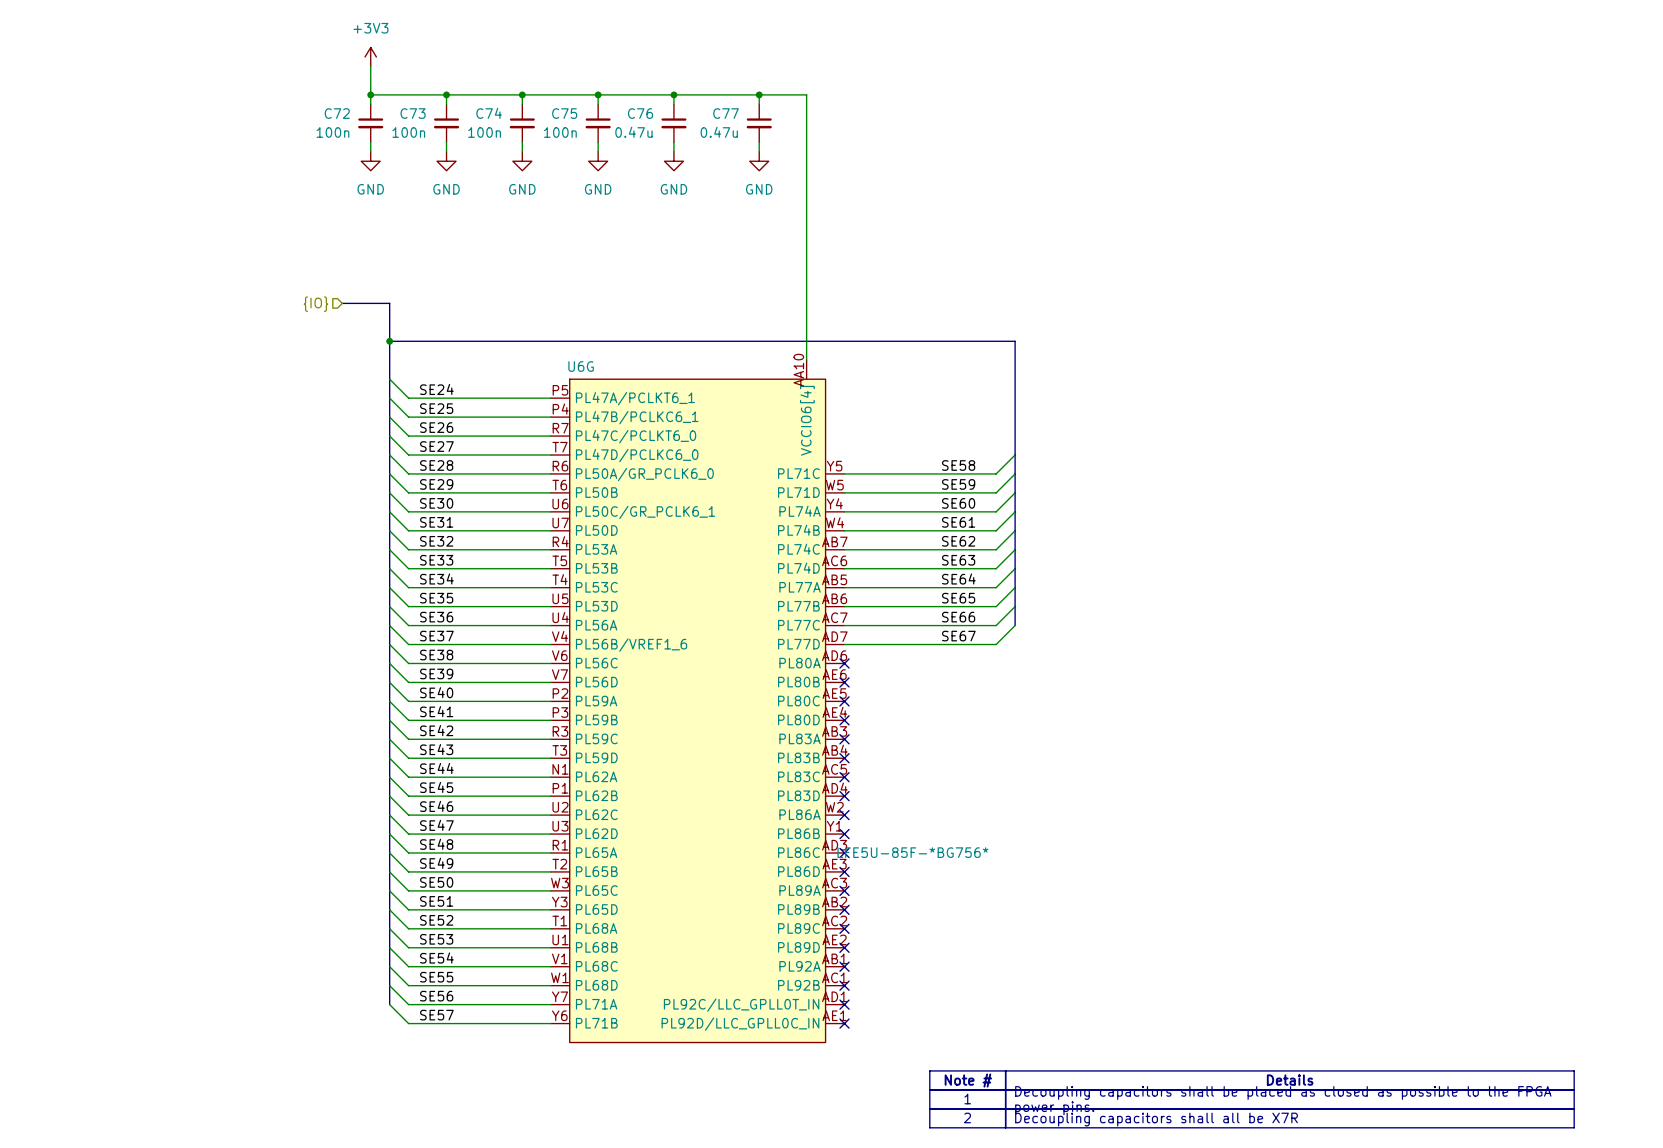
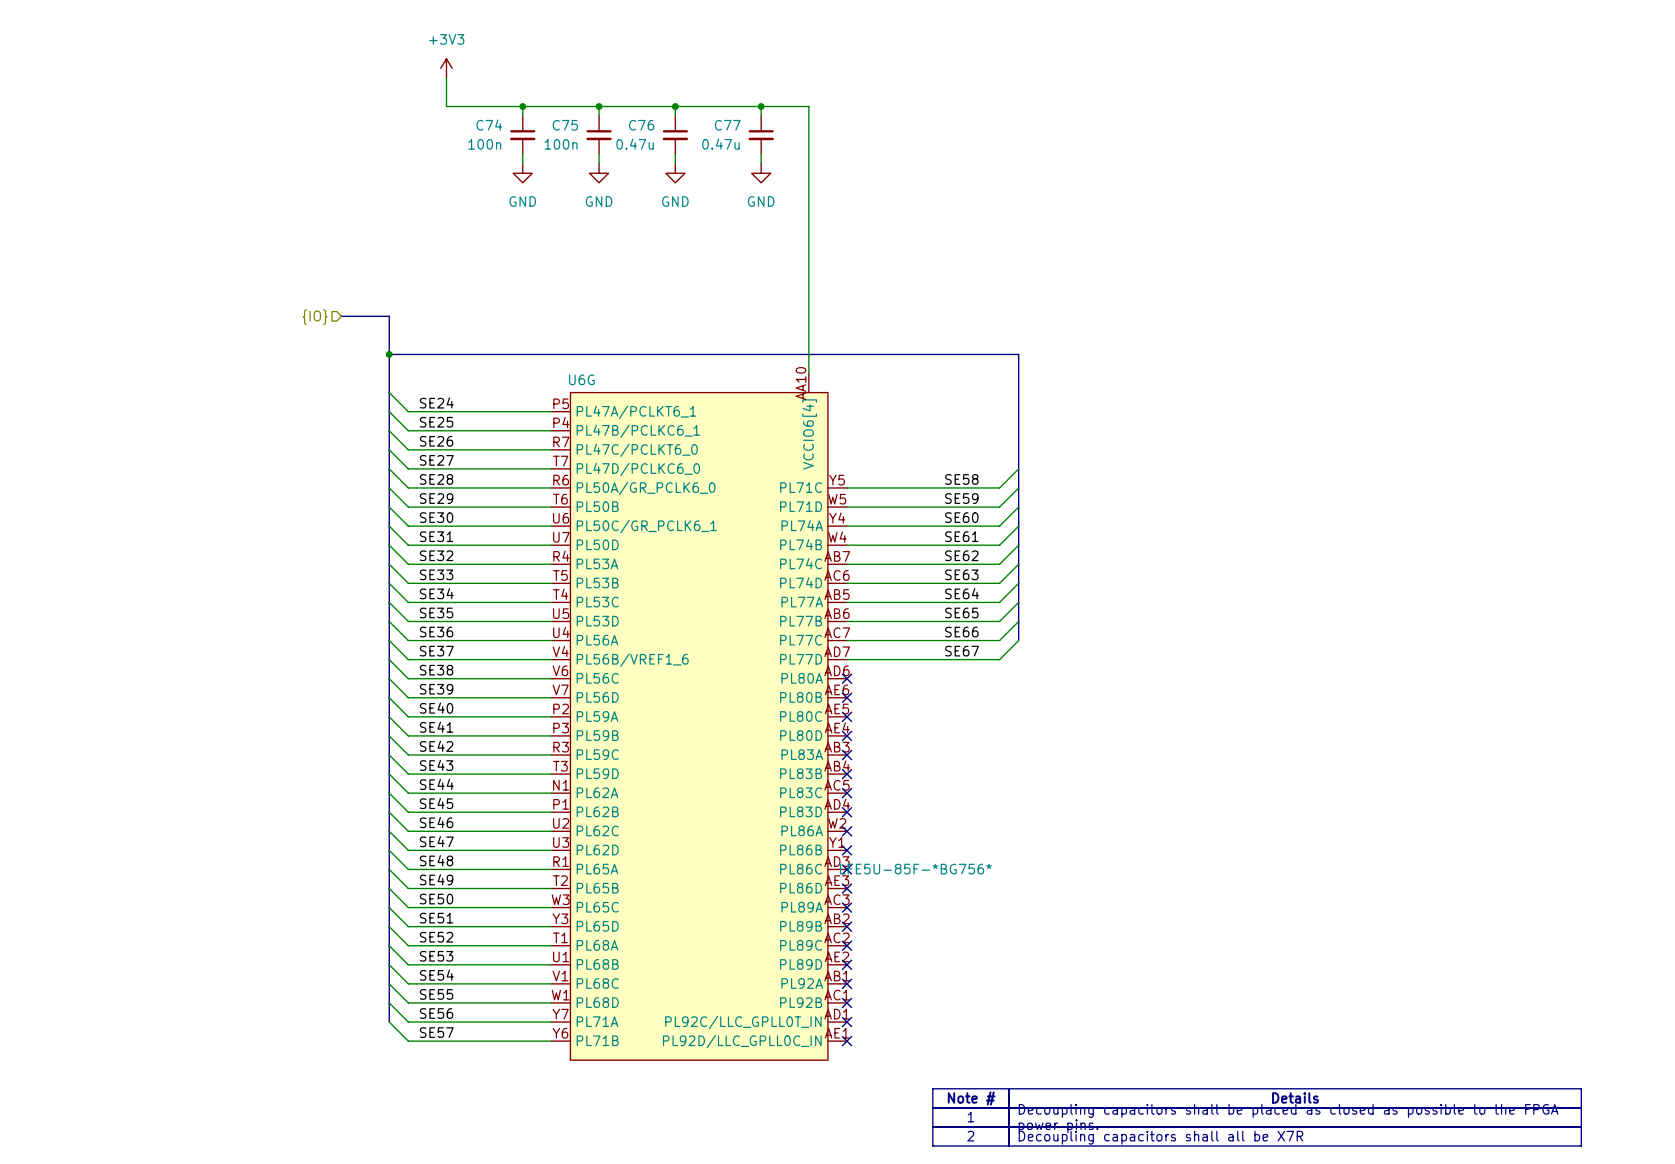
power symbol position: +3V3 (370, 57) -> +3V3 (446, 68)
wire: (370, 66) (370, 104) -> none
wire: none -> (446, 77) (446, 106)
wire: (370, 94) (446, 94) (446, 104) -> none
junction: (370, 94) -> none
junction: (446, 94) -> none
C72: 100n (370, 123) -> none
C73: 100n (446, 123) -> none
wire: (370, 142) (370, 151) -> none
wire: (446, 142) (446, 151) -> none
power symbol: GND (370, 161) -> none
power symbol: GND (446, 161) -> none

